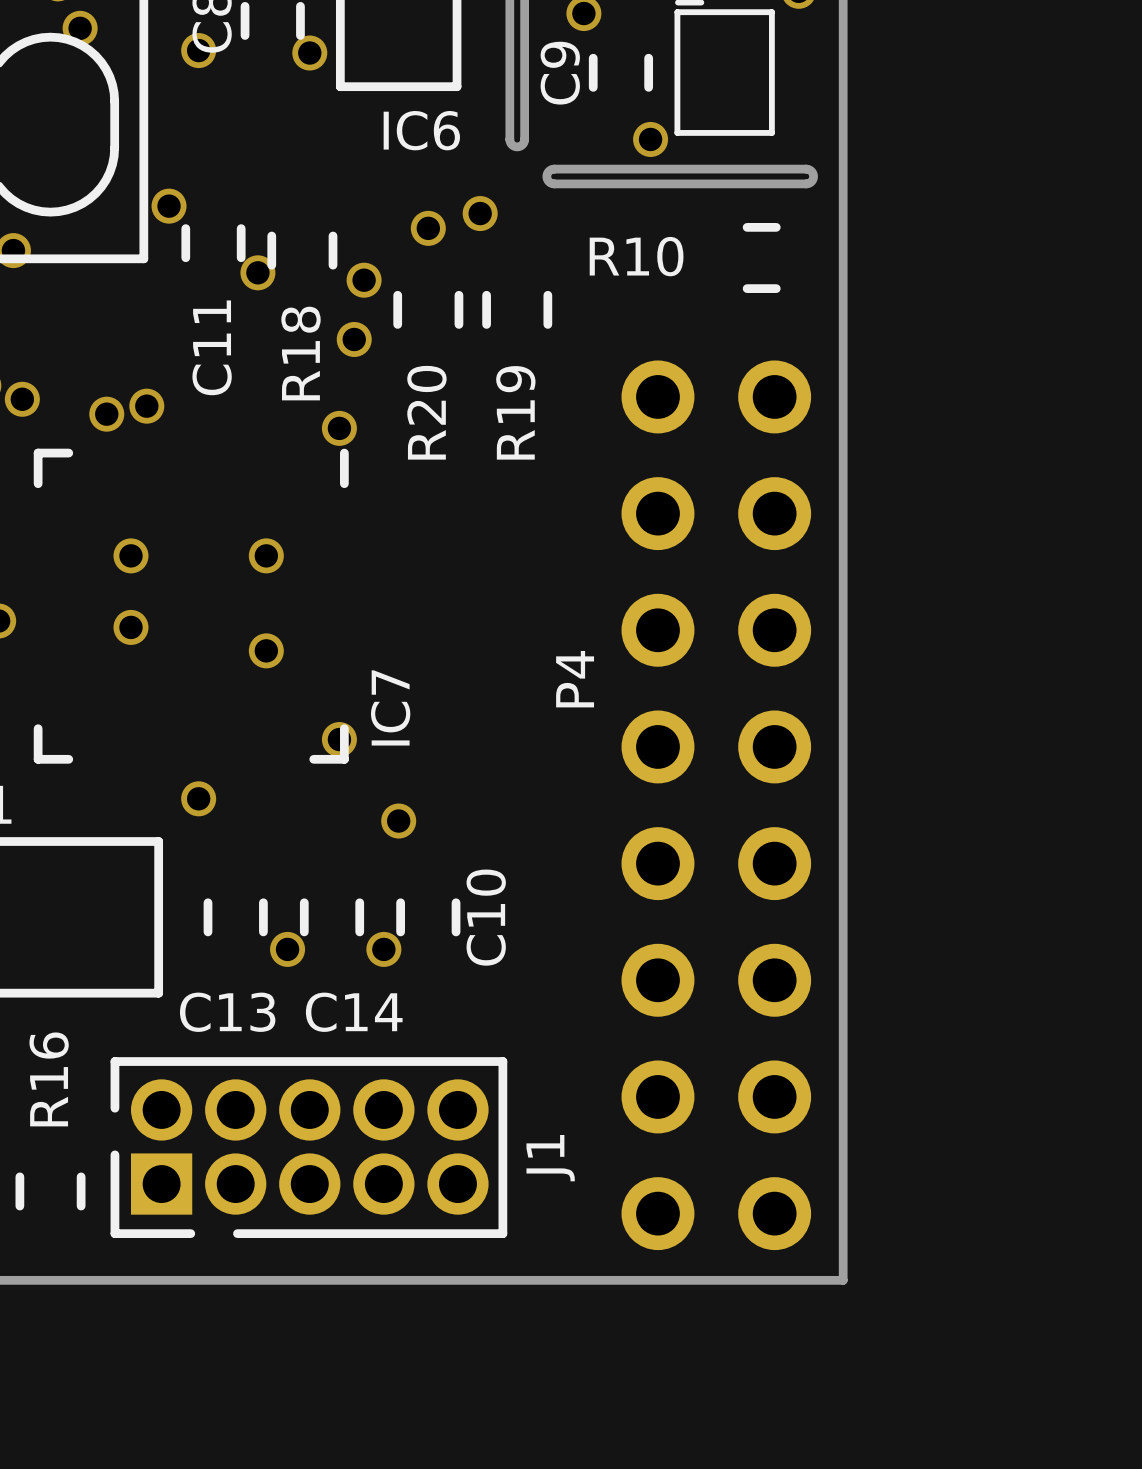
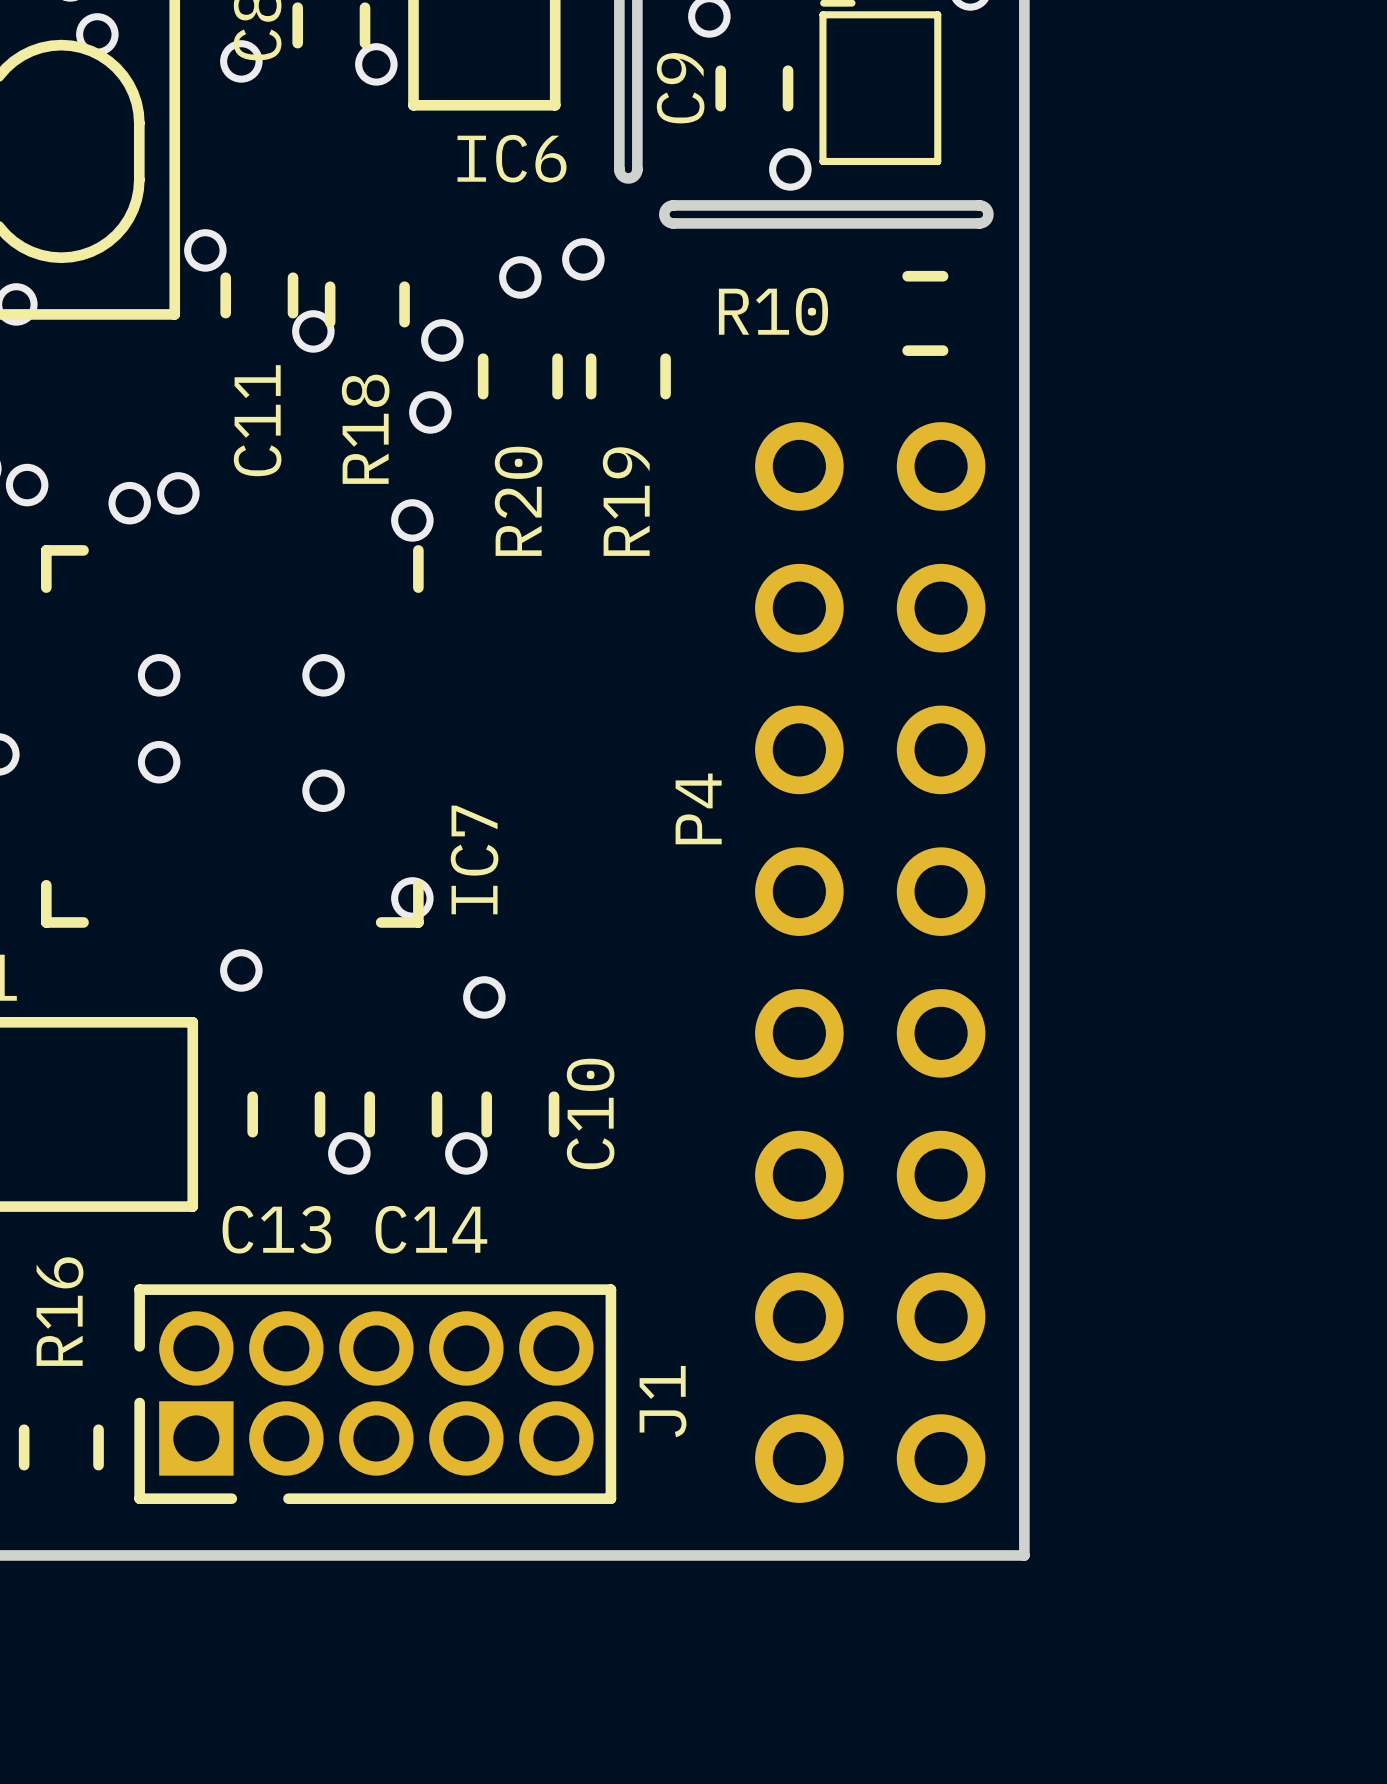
P4 position: (716, 805) -> (870, 962)

